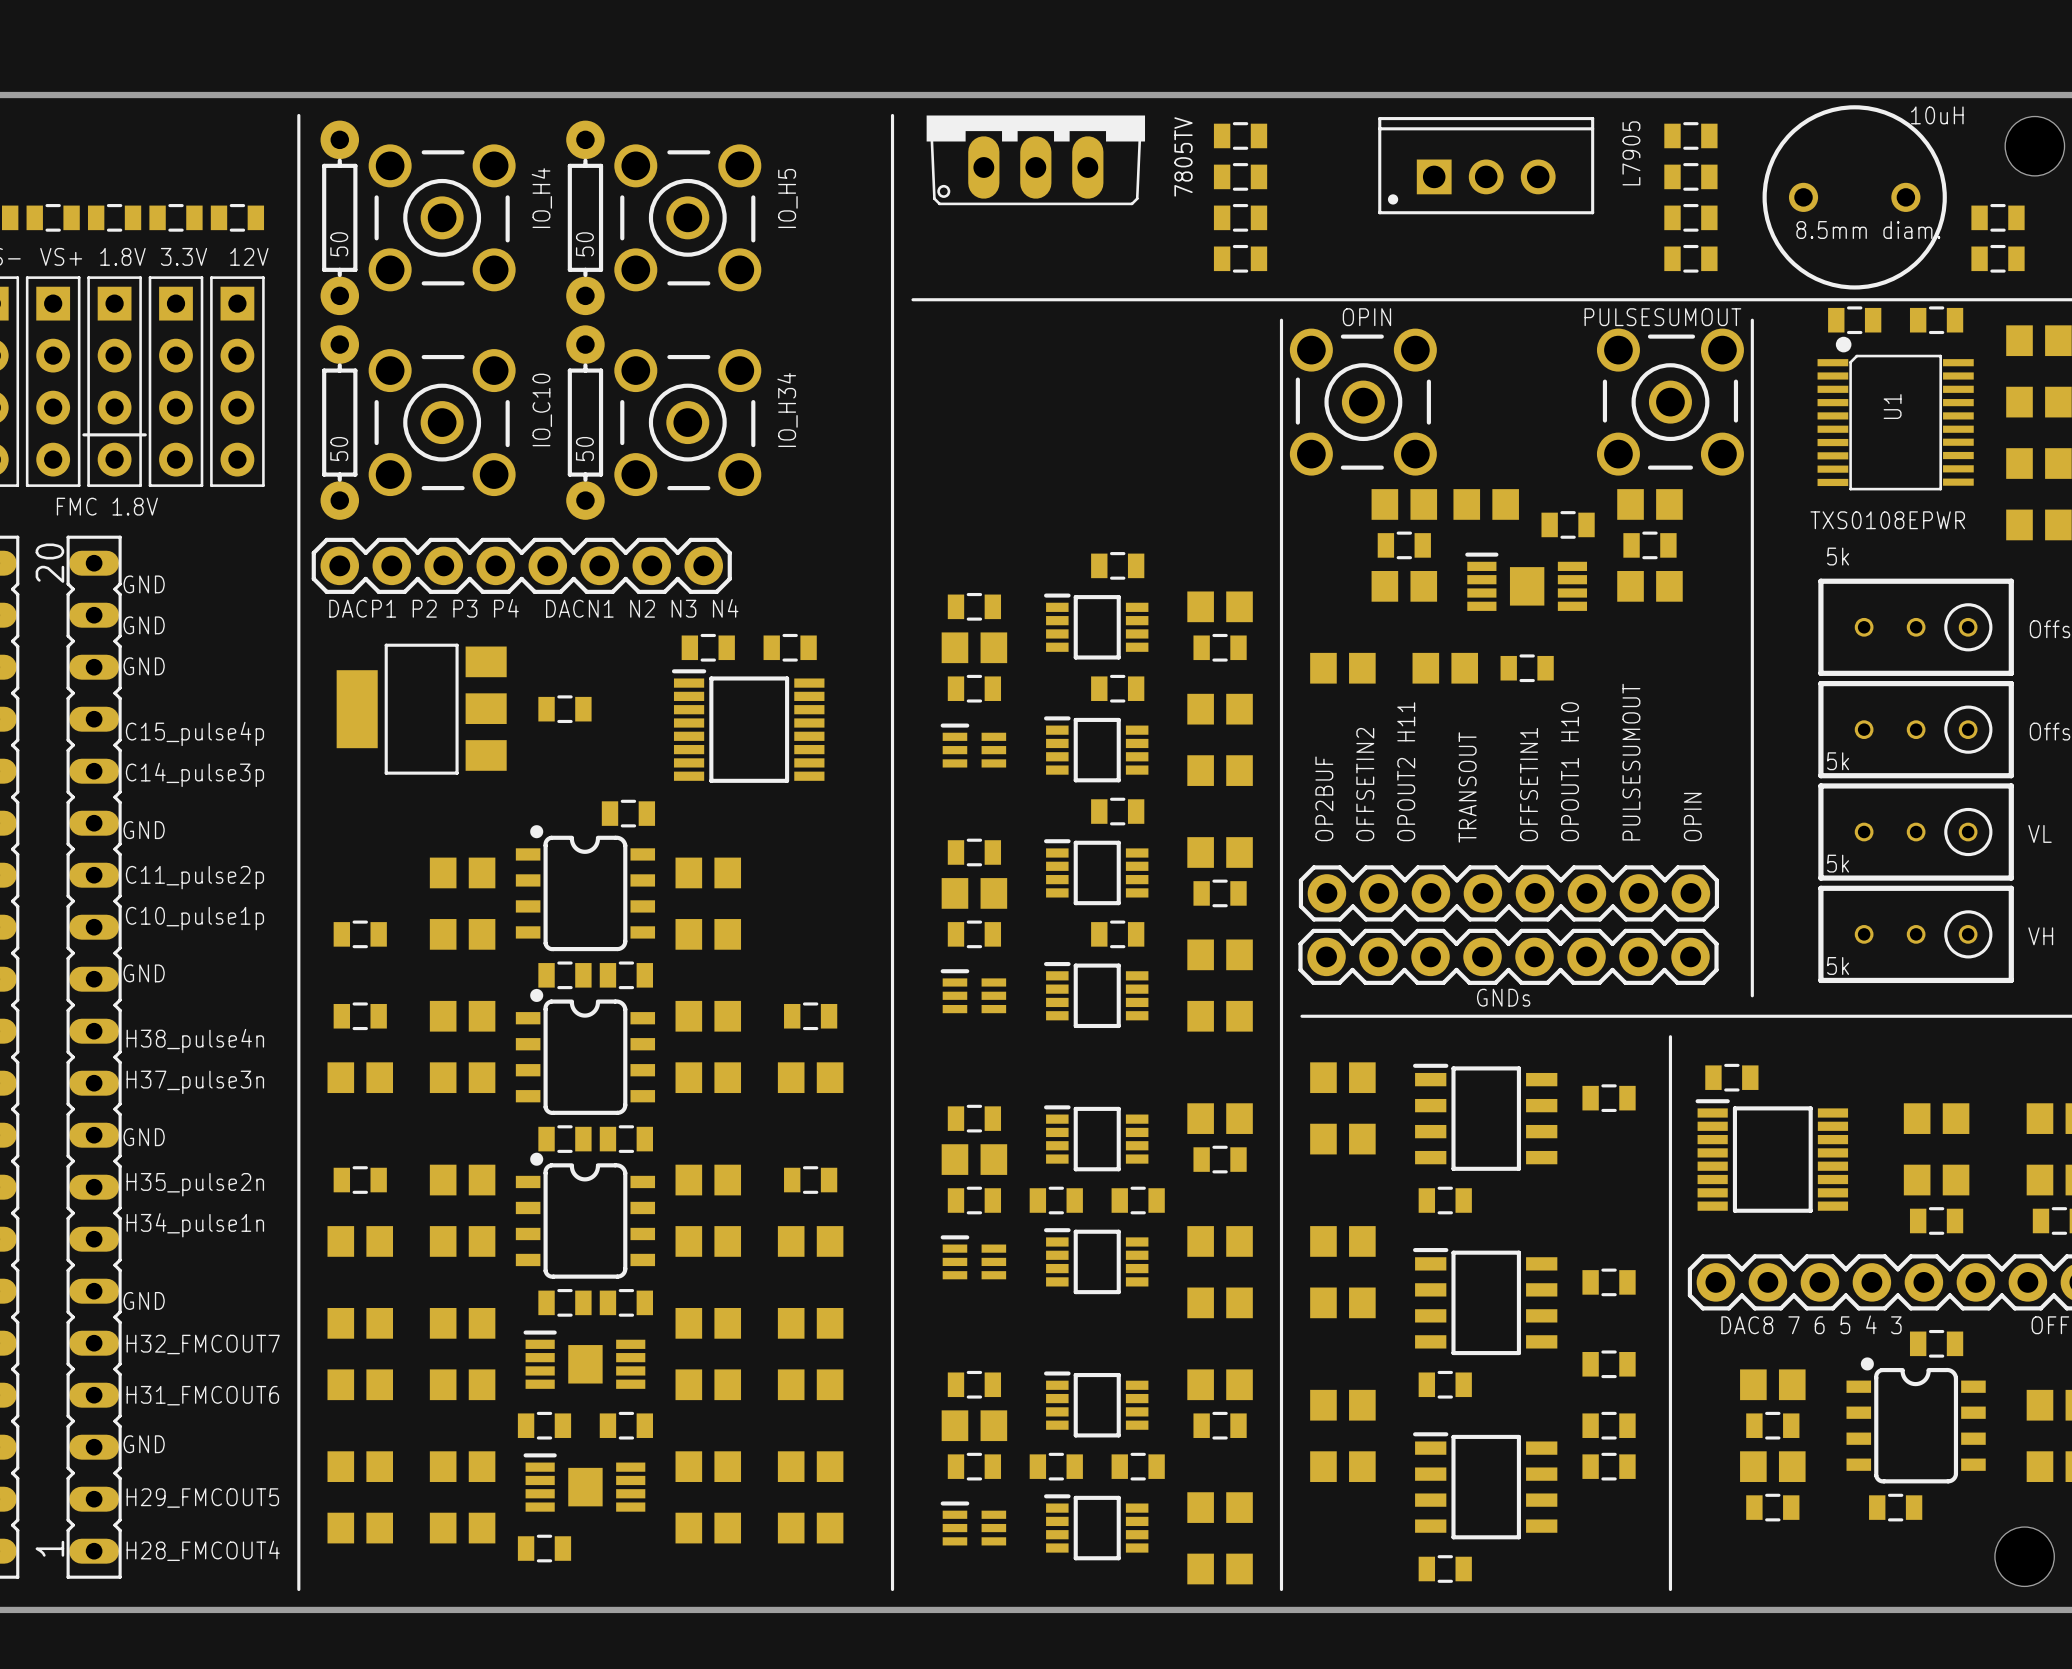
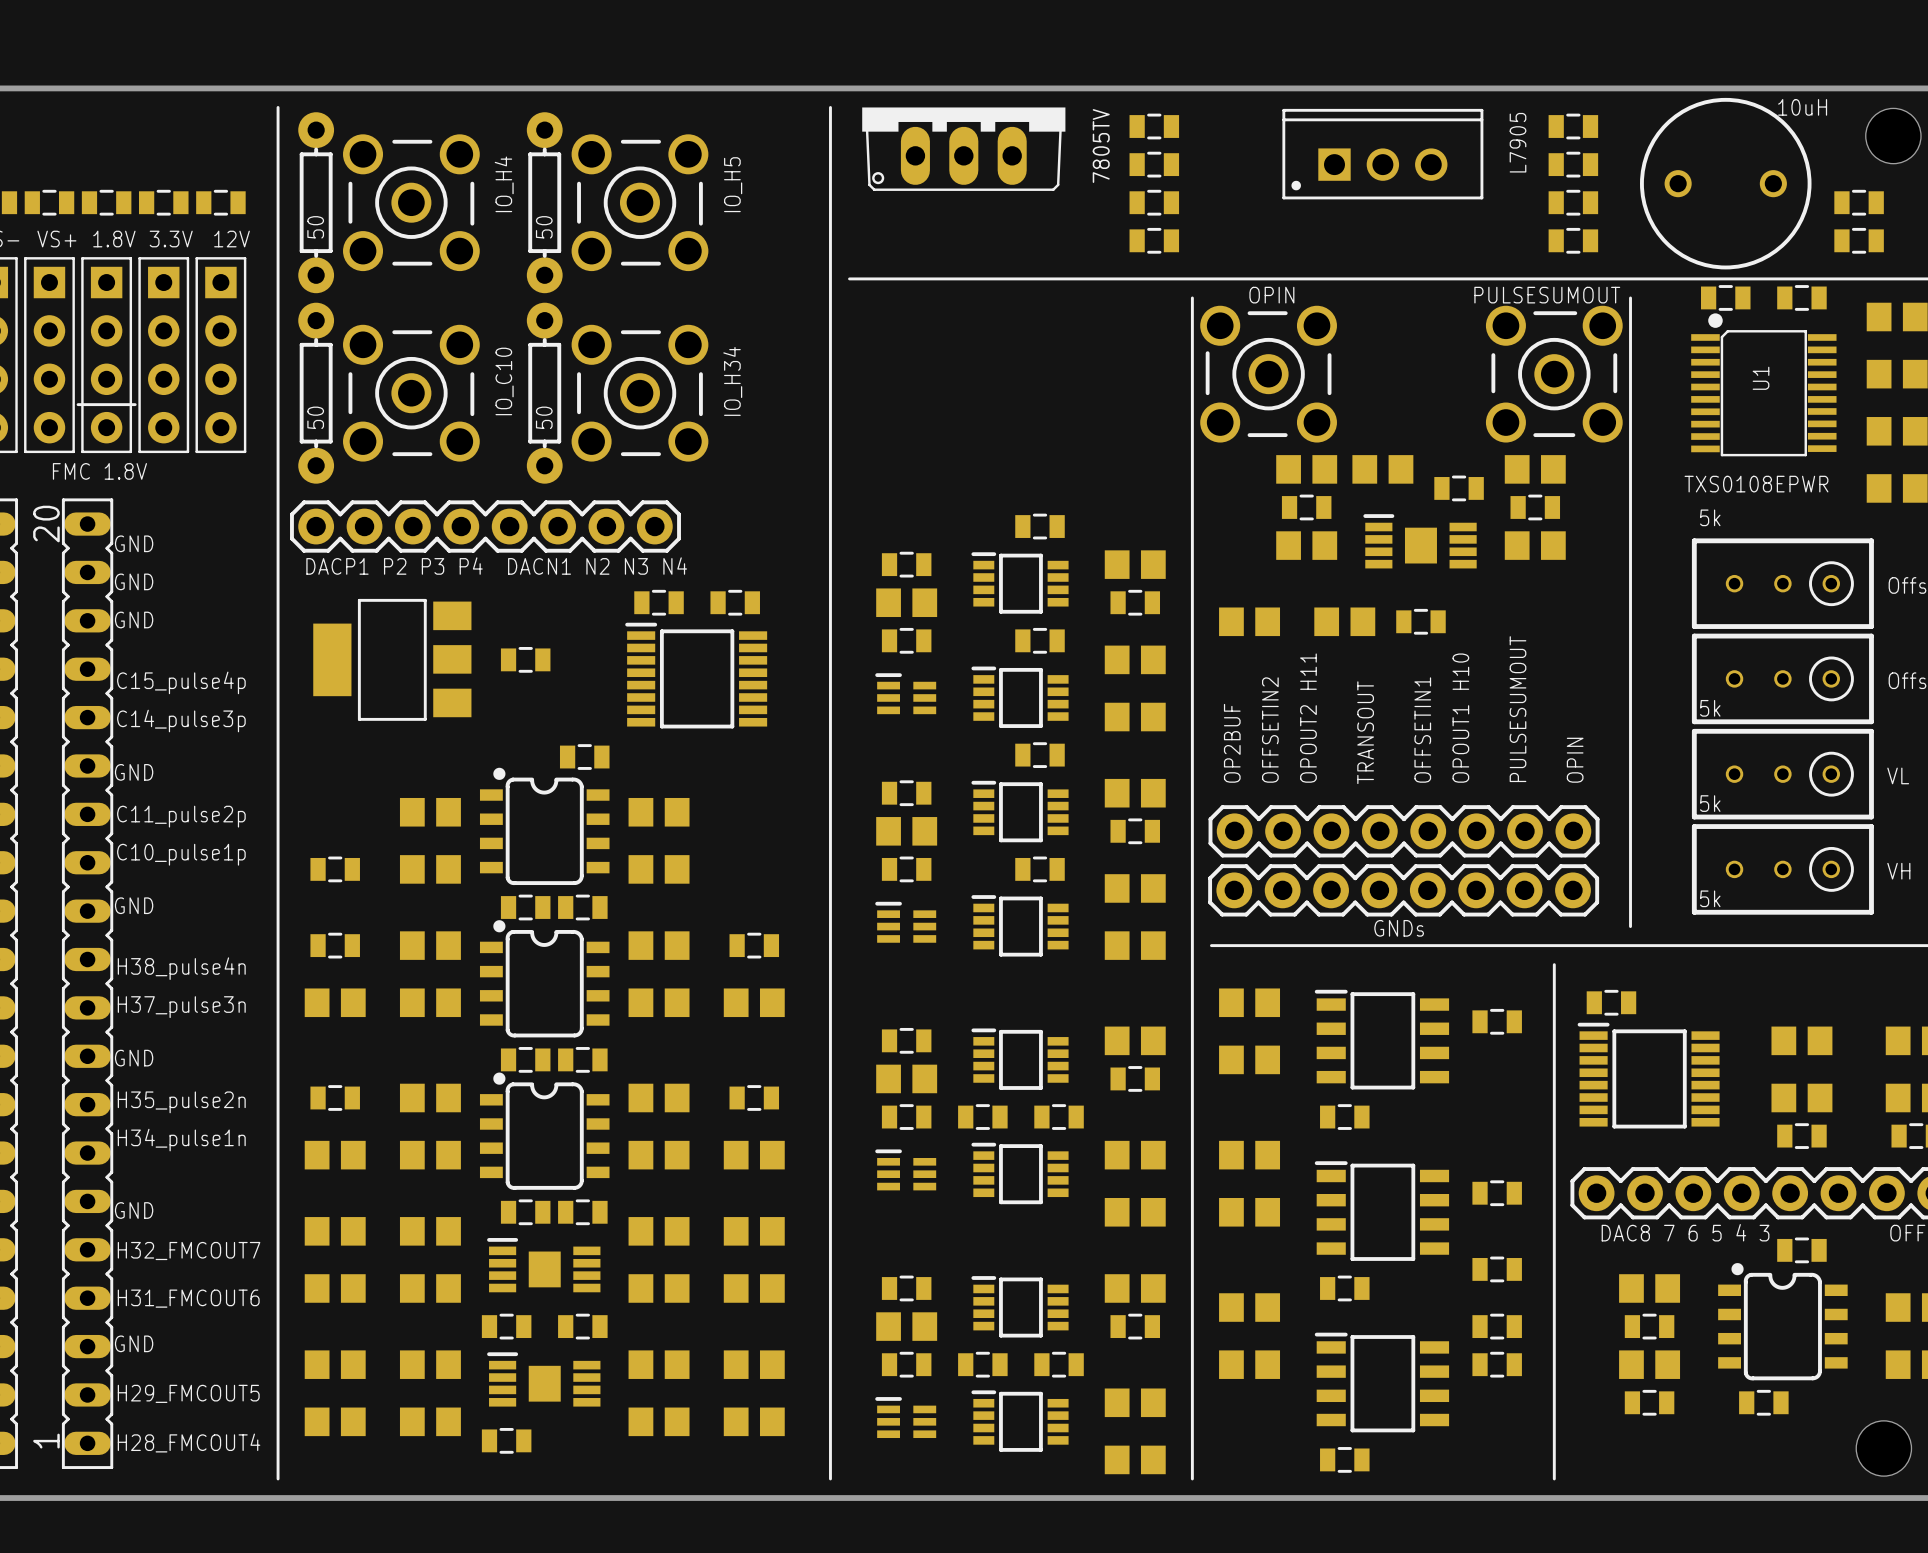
text: 8.5mm diam. (1868, 230) -> none

